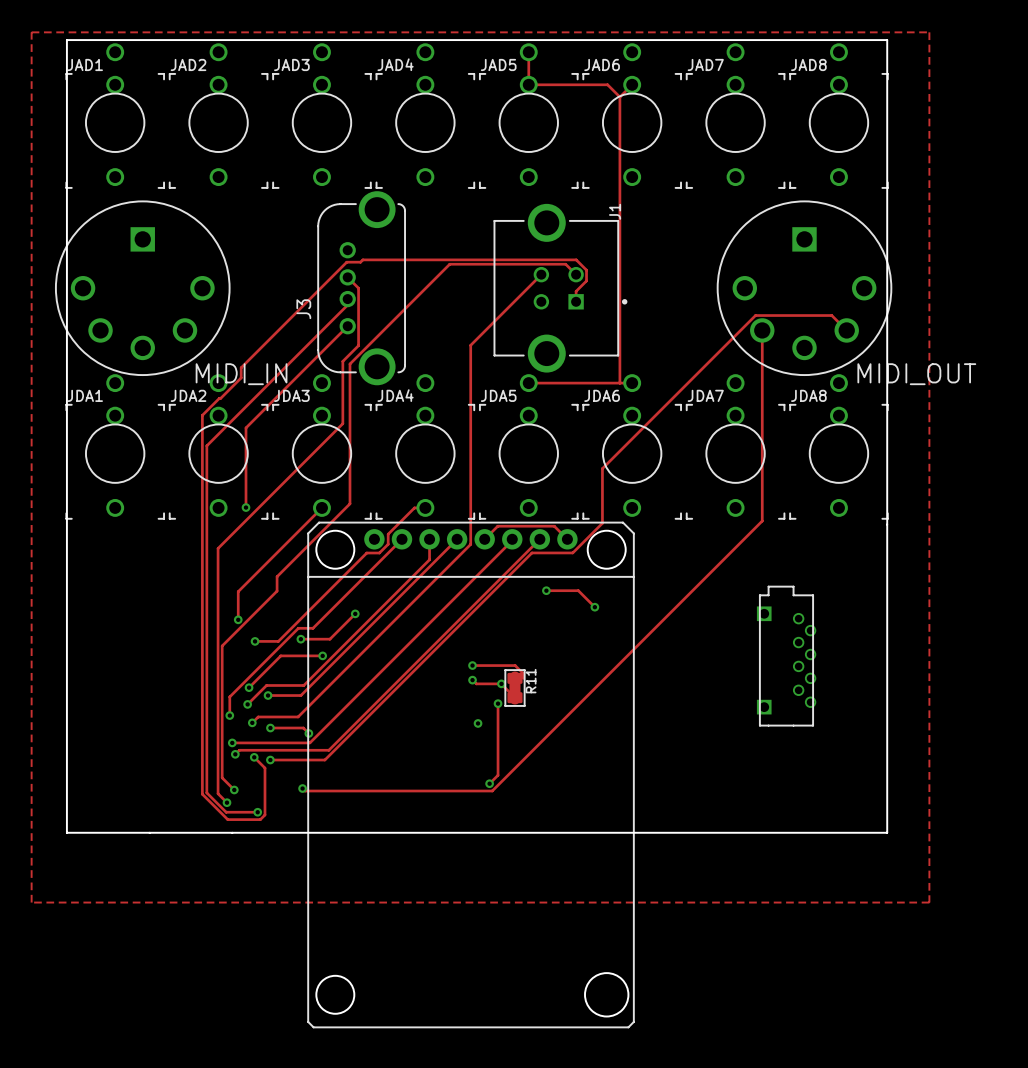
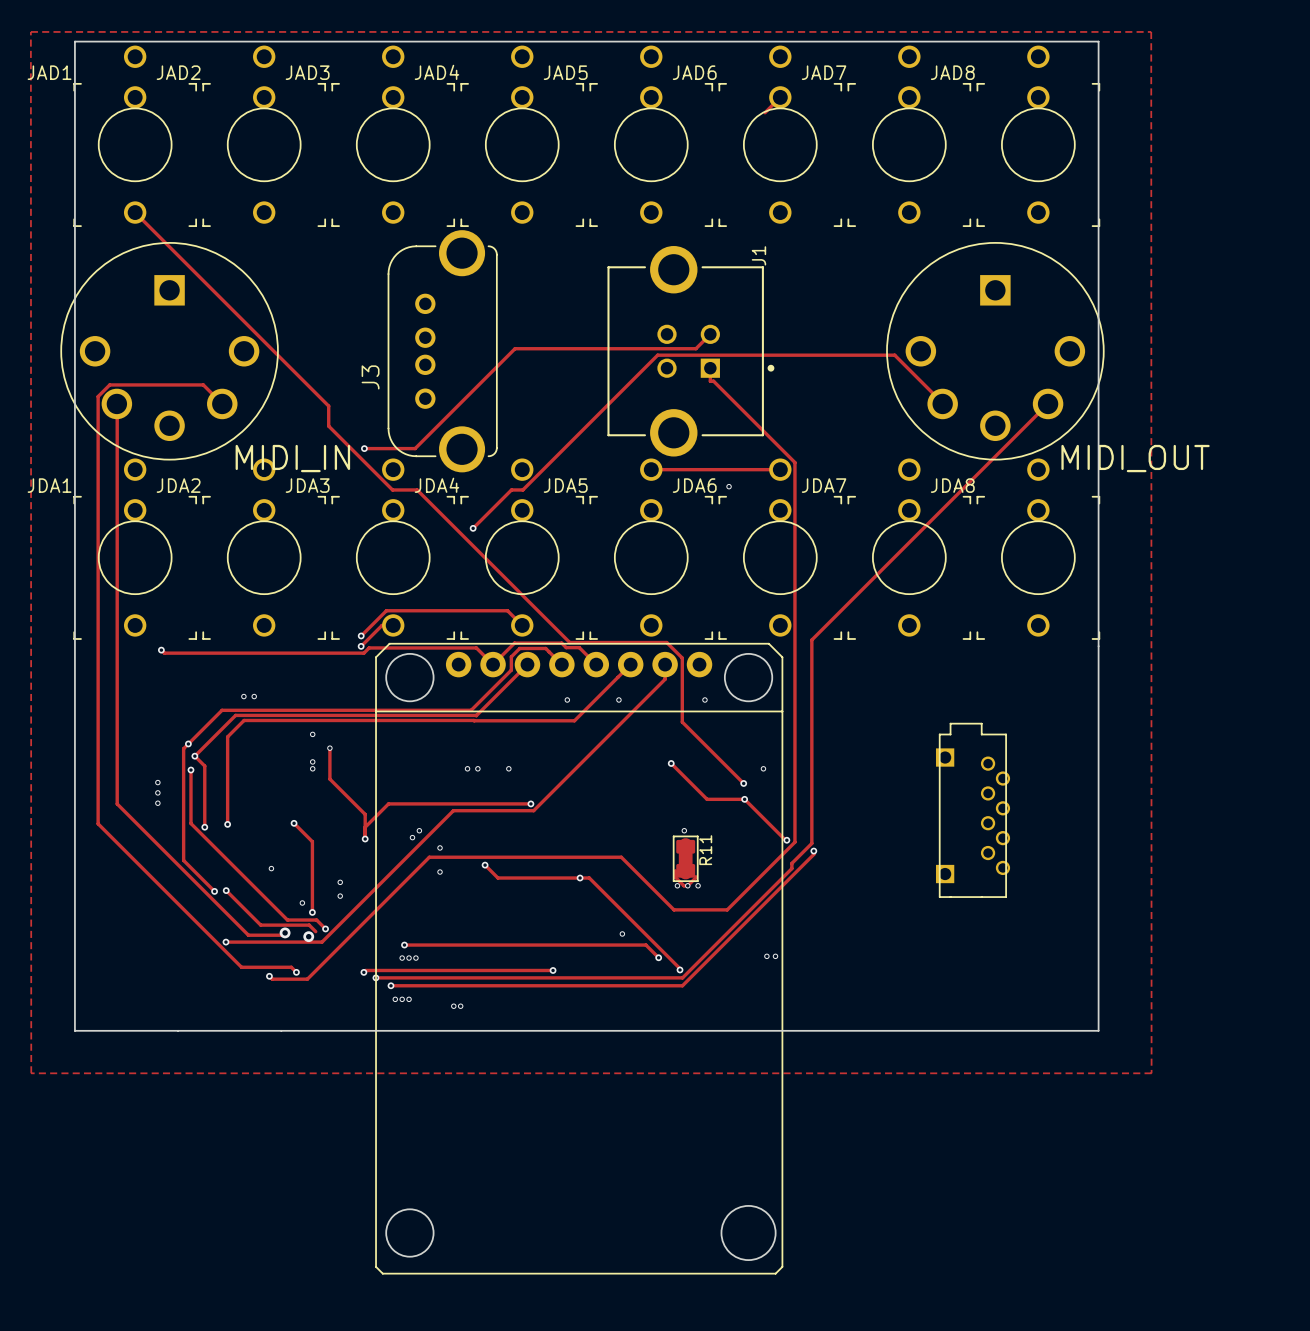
zone outline: (31, 32) (31, 902) (929, 902) (929, 32) -> (30, 31) (31, 1073) (1151, 1073) (1151, 31)
track: (528, 52) (528, 84) (607, 84) (619, 97) (619, 383) -> none
JAD1 name position: JAD1 (85, 64) -> JAD1 (49, 72)
JAD2 name position: JAD2 (188, 64) -> JAD2 (178, 72)
JAD3 name position: JAD3 (291, 64) -> JAD3 (307, 72)
JAD4 name position: JAD4 (395, 64) -> JAD4 (436, 72)
JAD5 name position: JAD5 (498, 64) -> JAD5 (565, 72)
JAD6 name position: JAD6 (602, 64) -> JAD6 (694, 72)
JAD7 name position: JAD7 (705, 64) -> JAD7 (824, 72)
JAD8 name position: JAD8 (808, 64) -> JAD8 (952, 72)
track: none -> (135, 212) (328, 406) (328, 426) (392, 489) (417, 489) (569, 642) (666, 642) (682, 658) (682, 722) (743, 783)
track: (541, 274) (470, 345) (470, 544) (298, 716) (258, 716) (252, 722) -> none
track: (576, 274) (565, 264) (449, 264) (349, 364) (349, 503) (277, 576) (277, 591) (222, 645) (222, 777) (234, 789) -> (710, 334) (695, 348) (515, 348) (415, 448) (364, 448)
track: (347, 277) (358, 288) (358, 345) (342, 361) (342, 423) (218, 548) (218, 793) (226, 802) -> none
track: (347, 299) (347, 305) (206, 445) (206, 792) (226, 812) (257, 812) -> none
track: (576, 301) (576, 291) (586, 280) (586, 270) (576, 259) (362, 259) (360, 262) (346, 262) (241, 367) (241, 377) (202, 415) (202, 794) (227, 819) (260, 819) (264, 814) (264, 768) (254, 757) -> (710, 368) (710, 381) (713, 381) (794, 462) (794, 842) (727, 909) (673, 909) (621, 857) (429, 857) (307, 979) (272, 979) (269, 976)
track: (347, 326) (246, 427) (246, 507) -> none
track: none -> (117, 404) (117, 803) (248, 935) (285, 935)
track: none -> (222, 404) (203, 384) (109, 384) (98, 396) (98, 823) (241, 967) (291, 967) (296, 972)
track: (762, 330) (762, 521) (492, 791) (305, 791) (302, 788) -> none
track: none -> (943, 403) (894, 355) (657, 355) (522, 489) (511, 489) (473, 528)
track: (846, 330) (831, 315) (755, 315) (602, 468) (602, 523) (572, 552) (531, 552) (324, 760) (270, 760) -> none
track: none -> (1048, 403) (811, 640) (811, 843) (791, 863) (791, 868) (682, 977) (375, 977)
via: none -> (364, 448)
JDA1 name position: JDA1 (85, 395) -> JDA1 (49, 485)
JDA2 name position: JDA2 (188, 395) -> JDA2 (178, 485)
JDA3 name position: JDA3 (291, 395) -> JDA3 (307, 485)
JDA4 name position: JDA4 (395, 395) -> JDA4 (436, 485)
JDA5 name position: JDA5 (498, 395) -> JDA5 (565, 485)
JDA6 name position: JDA6 (602, 395) -> JDA6 (694, 485)
JDA7 name position: JDA7 (705, 395) -> JDA7 (824, 485)
JDA8 name position: JDA8 (808, 395) -> JDA8 (952, 485)
via: none -> (729, 486)
via: none -> (473, 528)
via: (246, 507) -> none
track: (321, 507) (238, 591) (238, 619) -> (393, 625) (382, 625) (361, 646)
track: (425, 507) (414, 507) (388, 534) (388, 544) (379, 553) (366, 553) (278, 641) (255, 641) -> (522, 625) (507, 610) (386, 610) (361, 635)
via: none -> (361, 635)
via: none -> (361, 646)
via: none -> (161, 650)
track: (401, 539) (312, 628) (298, 628) (229, 696) (229, 715) -> none
track: (429, 539) (429, 559) (303, 685) (266, 685) (247, 704) -> (527, 664) (476, 715) (235, 715) (194, 756) (204, 766) (204, 827)
track: (457, 539) (300, 695) (268, 695) -> (561, 664) (545, 648) (519, 648) (511, 656) (511, 670) (471, 710) (222, 710) (183, 748) (183, 860) (214, 891)
track: (484, 539) (497, 526) (554, 526) (567, 539) -> (596, 664) (579, 647) (566, 647) (561, 643) (514, 643) (493, 664) (476, 647) (369, 647) (363, 653) (164, 653) (161, 650)
track: (512, 539) (309, 742) (232, 742) -> (630, 664) (574, 720) (244, 720) (227, 736) (227, 824)
track: (539, 539) (328, 750) (239, 750) (235, 754) -> (665, 664) (665, 679) (533, 810) (453, 810) (322, 942) (225, 942)
via: none -> (243, 696)
via: none -> (254, 696)
via: none -> (567, 699)
via: none -> (618, 699)
via: none -> (704, 699)
track: (546, 590) (578, 590) (594, 607) -> none
via: (546, 590) -> none
via: none -> (312, 734)
via: none -> (188, 743)
track: none -> (329, 748) (329, 779) (365, 814) (365, 839)
via: none -> (329, 748)
via: (594, 607) -> none
via: none -> (194, 756)
track: (355, 613) (329, 639) (300, 639) -> none
via: (355, 613) -> none
via: none -> (312, 761)
track: none -> (671, 763) (707, 799) (744, 799) (786, 840)
via: none -> (671, 763)
via: (238, 619) -> none
via: none -> (312, 768)
via: none -> (467, 768)
via: none -> (477, 768)
via: none -> (508, 768)
via: none -> (763, 768)
track: none -> (190, 770) (190, 823) (287, 920) (316, 920) (325, 928)
via: none -> (190, 770)
via: none -> (157, 782)
via: none -> (743, 783)
via: (300, 639) -> none
via: (255, 641) -> none
via: none -> (157, 792)
via: none -> (744, 799)
via: none -> (157, 803)
track: none -> (530, 803) (388, 803) (365, 827)
via: none -> (530, 803)
track: (322, 655) (280, 655) (249, 687) -> none
via: (322, 655) -> none
track: (472, 665) (515, 665) (523, 673) (523, 678) -> none
via: (472, 665) -> none
track: none -> (294, 823) (312, 841) (312, 912)
via: none -> (294, 823)
via: none -> (227, 824)
via: none -> (204, 827)
via: none -> (419, 830)
via: none -> (684, 830)
via: none -> (412, 837)
via: none -> (365, 839)
track: (472, 680) (476, 683) (501, 683) (514, 697) -> none
via: (472, 680) -> none
via: none -> (786, 840)
via: (501, 683) -> none
via: none -> (440, 847)
via: (249, 687) -> none
R11 position: (514, 688) -> (685, 858)
track: none -> (813, 851) (813, 854) (682, 985) (390, 985)
via: none -> (813, 851)
via: (268, 695) -> none
track: none -> (485, 865) (497, 878) (589, 878) (680, 969)
via: none -> (485, 865)
via: none -> (271, 868)
track: (498, 703) (498, 775) (489, 783) -> none
via: (498, 703) -> none
via: (247, 704) -> none
track: none -> (675, 870) (675, 877) (683, 885) (687, 885) (695, 876)
via: none -> (440, 872)
via: none -> (580, 878)
via: none -> (340, 882)
via: (229, 715) -> none
via: none -> (677, 885)
via: none -> (687, 885)
via: none -> (698, 885)
track: none -> (226, 890) (260, 925) (309, 925) (315, 931)
via: none -> (226, 890)
via: none -> (214, 891)
via: (252, 722) -> none
via: (478, 723) -> none
via: none -> (340, 896)
track: (270, 728) (303, 728) (308, 733) -> none
via: (270, 728) -> none
via: none -> (302, 903)
via: (308, 733) -> none
via: none -> (312, 912)
via: (232, 742) -> none
via: none -> (325, 928)
via: none -> (622, 933)
via: (270, 760) -> none
via: none -> (225, 942)
track: none -> (404, 945) (645, 945) (658, 957)
via: none -> (404, 945)
via: none -> (766, 956)
via: none -> (775, 956)
via: none -> (402, 958)
via: none -> (409, 958)
via: none -> (415, 958)
via: none -> (658, 957)
via: (489, 783) -> none
track: none -> (553, 970) (365, 970) (363, 972)
via: none -> (553, 970)
via: none -> (680, 969)
via: none -> (296, 972)
via: none -> (363, 972)
via: (302, 788) -> none
via: none -> (269, 976)
via: (234, 789) -> none
via: none -> (375, 977)
via: none -> (390, 985)
via: (226, 802) -> none
via: none -> (395, 999)
via: none -> (402, 999)
via: none -> (409, 999)
via: (257, 812) -> none
via: none -> (453, 1006)
via: none -> (460, 1006)

